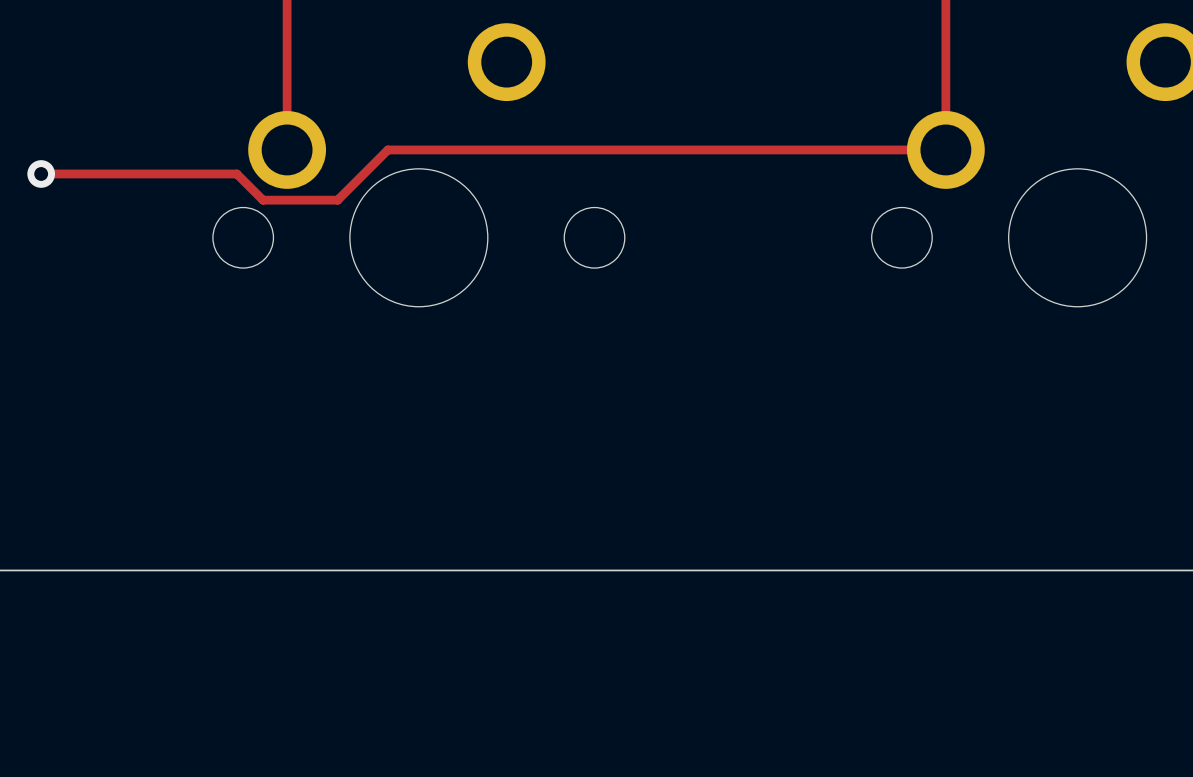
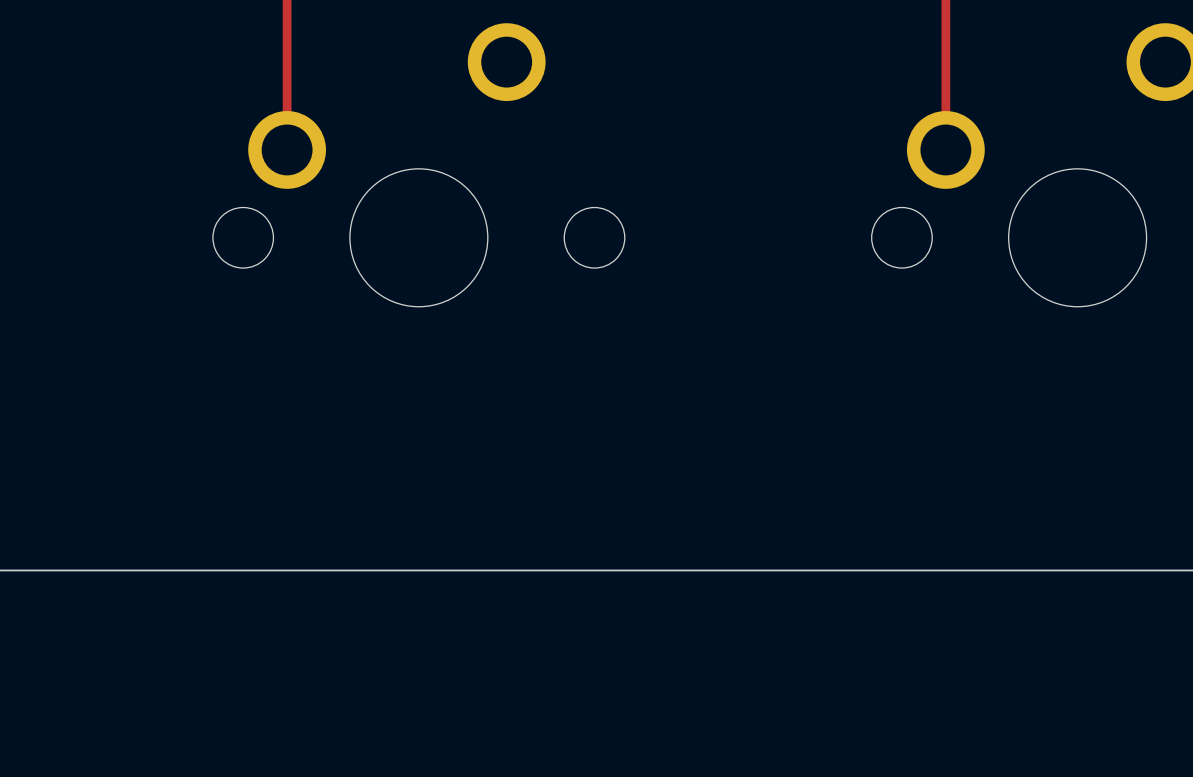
track: (945, 149) (387, 149) (337, 200) (263, 200) (236, 173) (41, 173) -> none
via: (41, 173) -> none

